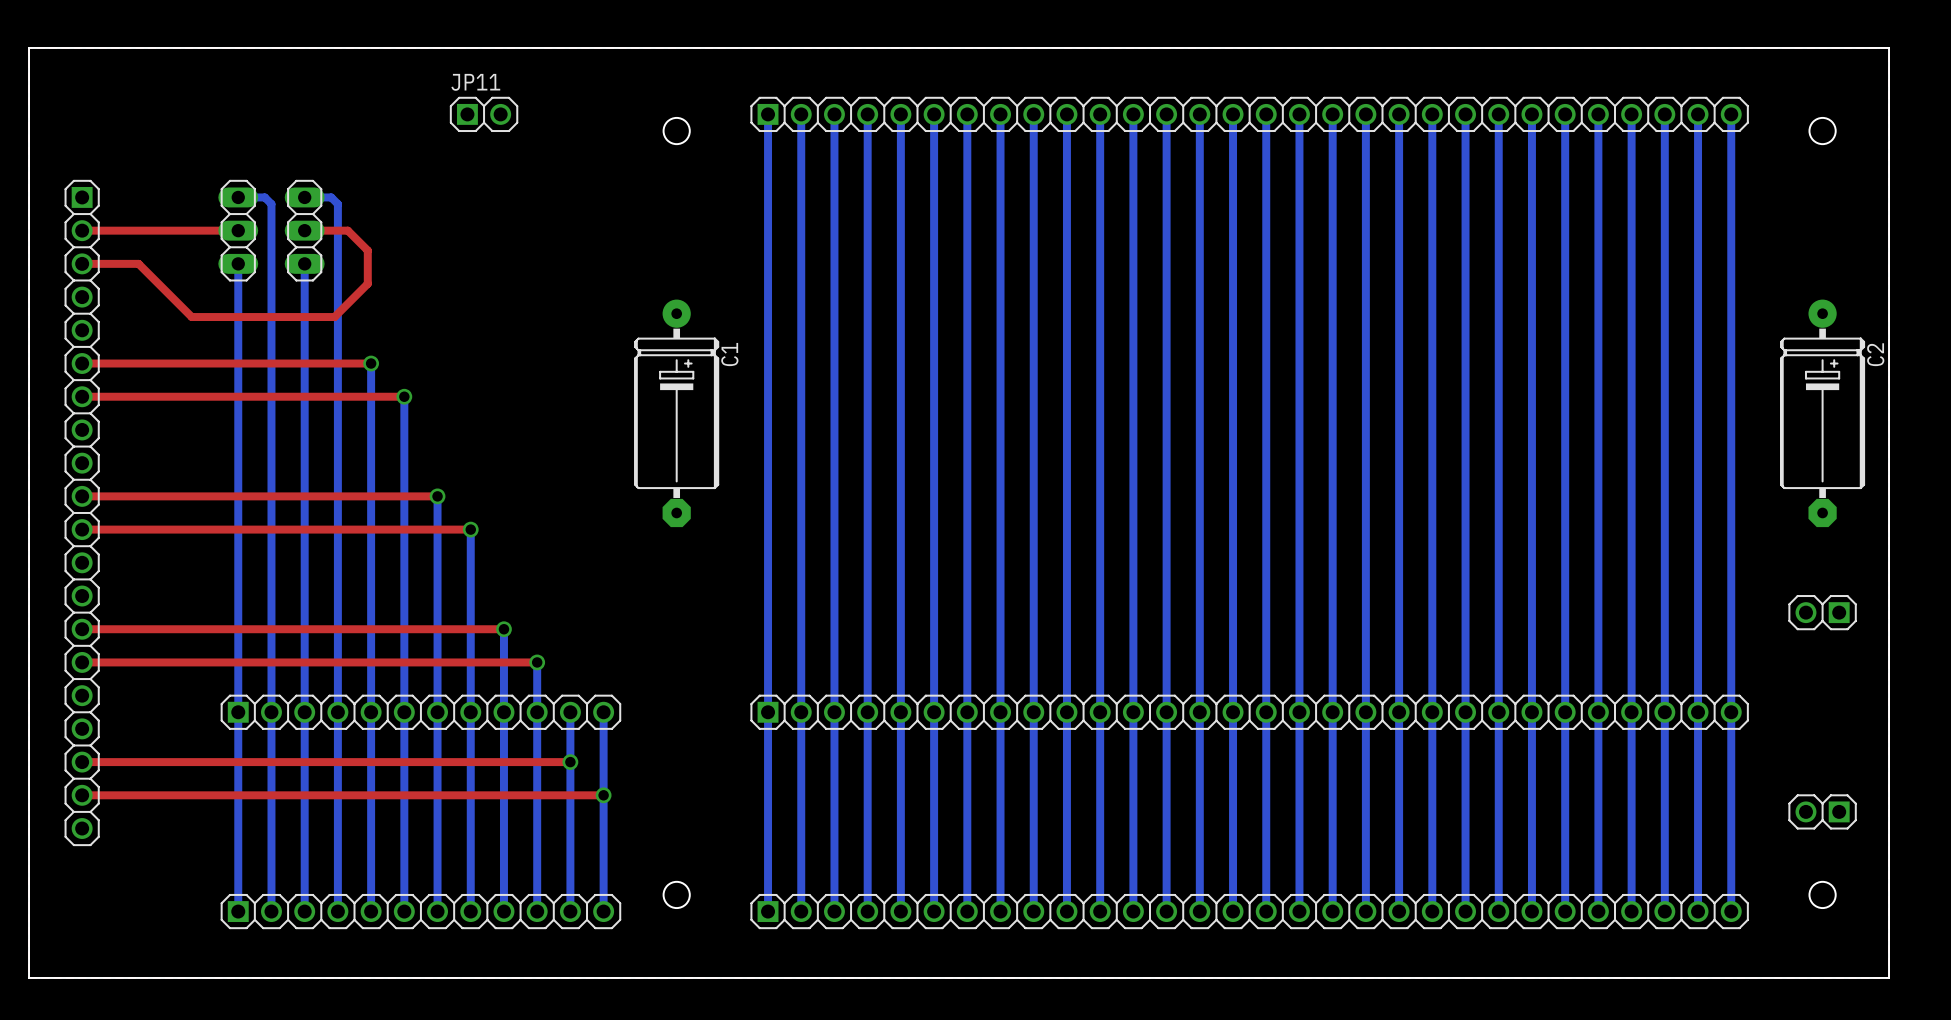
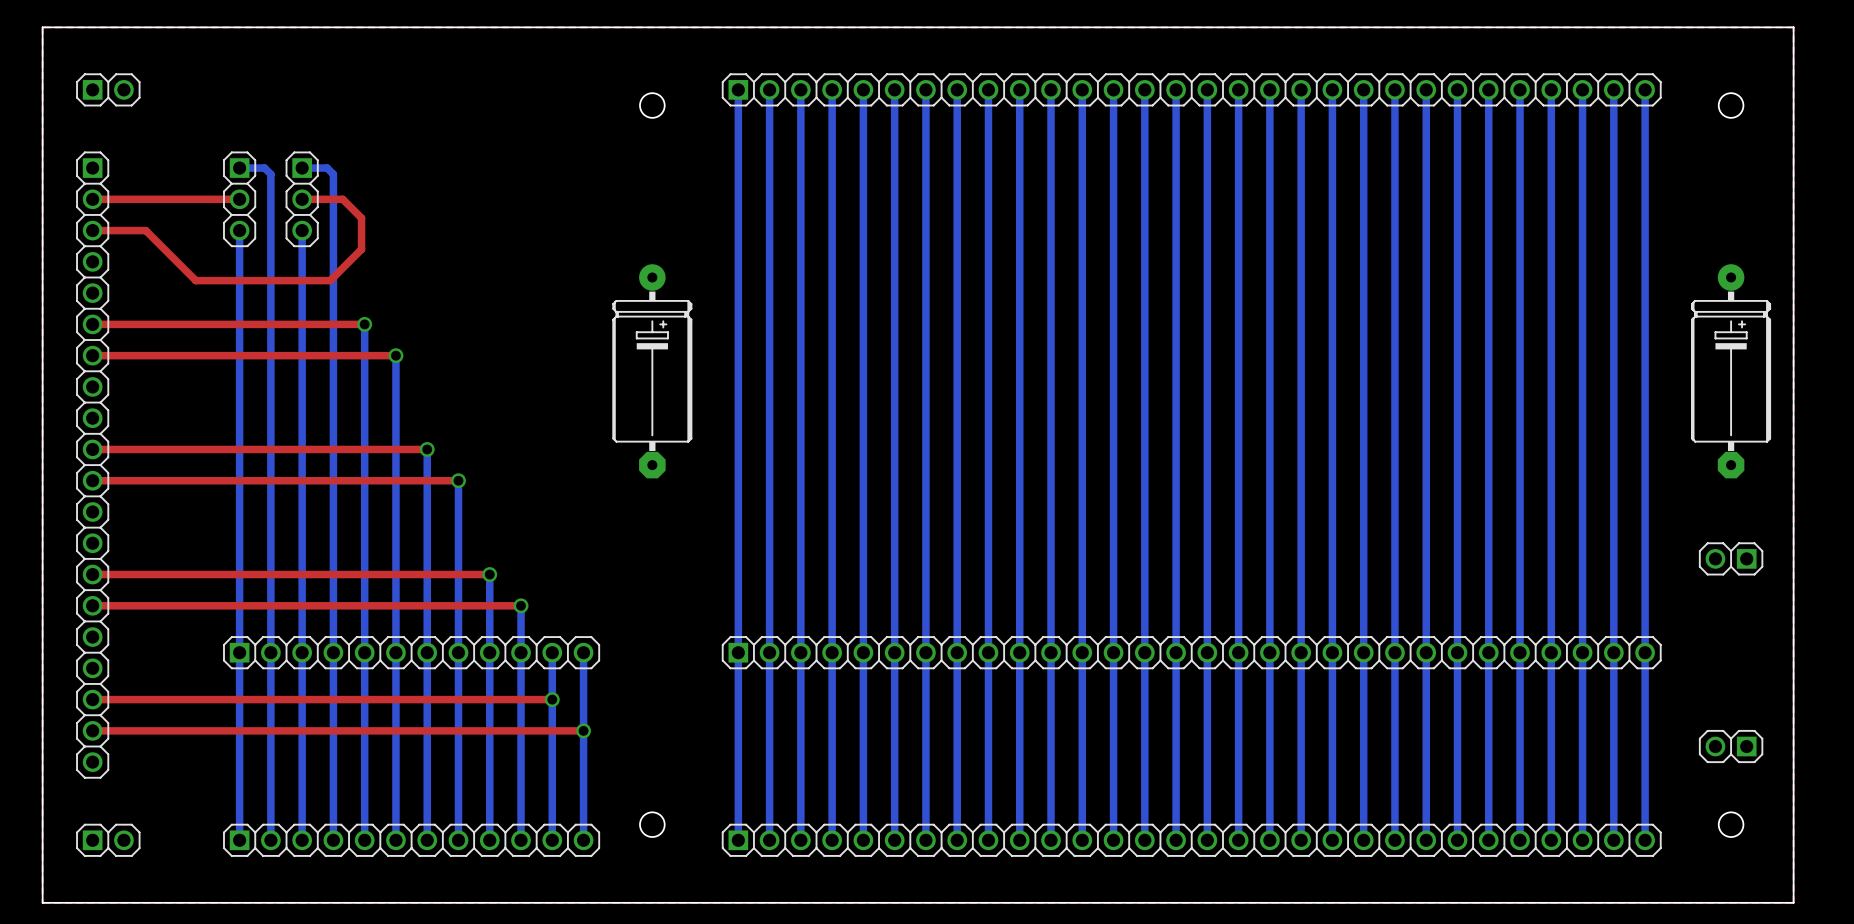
part: none -> (108, 89)
JP11: (484, 114) -> none
part footprint: [218, 179, 259, 282] -> [223, 151, 257, 248]
part footprint: [284, 179, 325, 282] -> [285, 151, 319, 248]
C1 name: C1 (729, 354) -> none
C2 name: C2 (1875, 354) -> none
part: none -> (108, 840)

